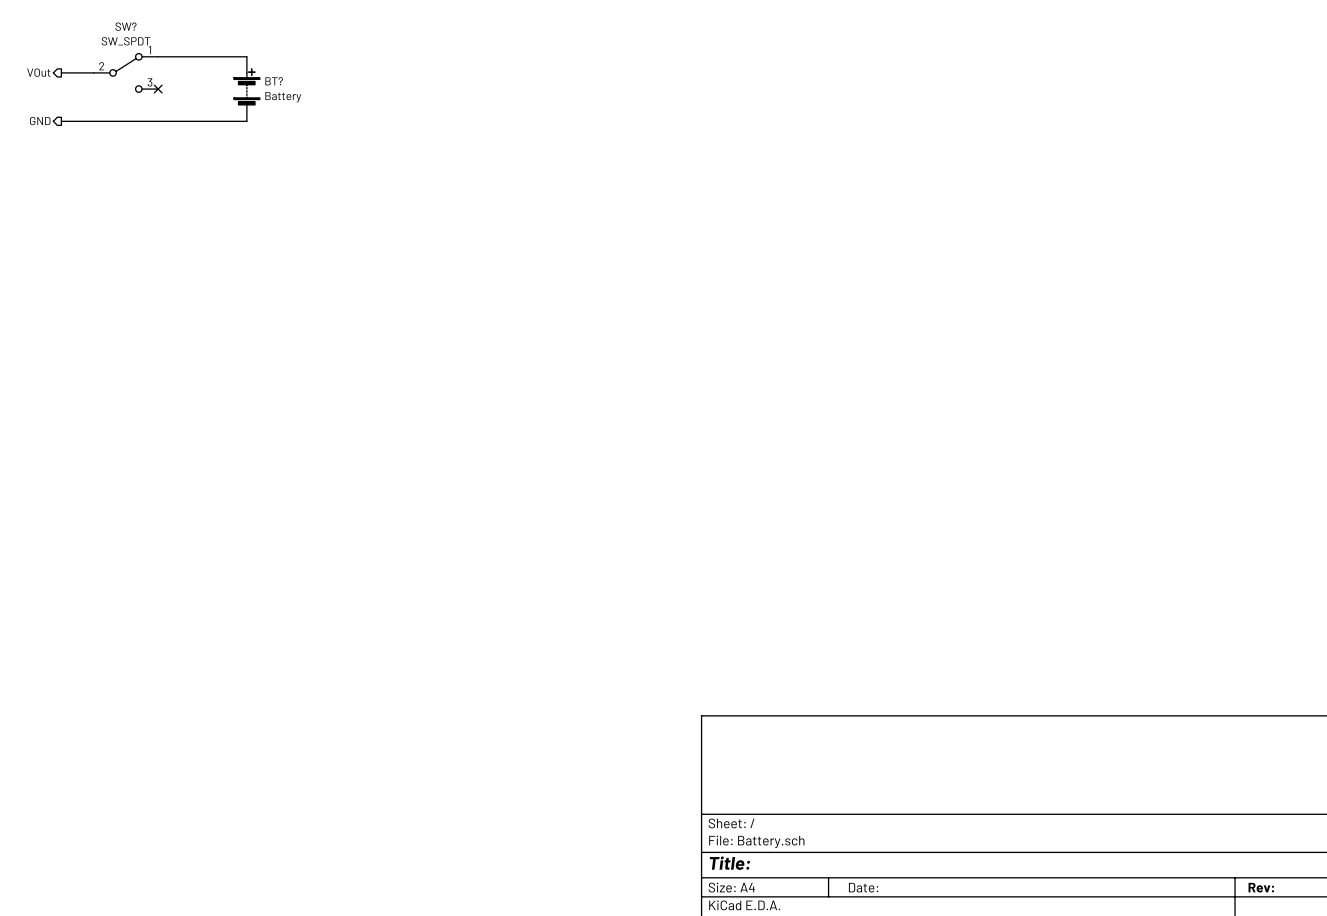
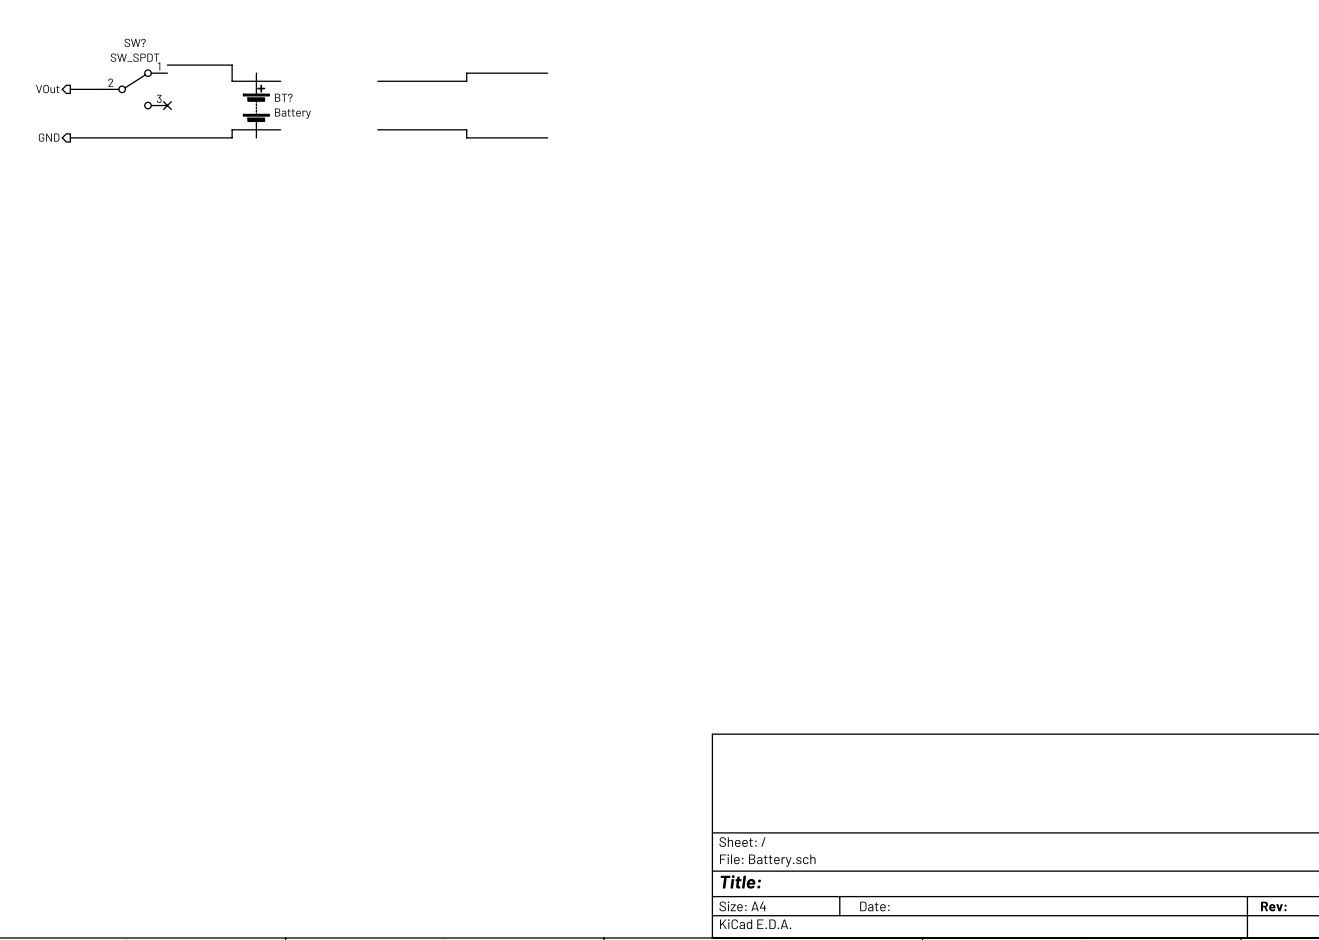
wire: none -> (167, 65) (232, 65) (232, 81) (280, 81)
wire: (158, 56) (246, 56) -> none
wire: none -> (547, 73) (466, 73) (466, 81) (377, 81)
wire: none -> (377, 129) (466, 129) (466, 137) (547, 137)
wire: (222, 121) (246, 121) -> (232, 137) (232, 129) (280, 129)

